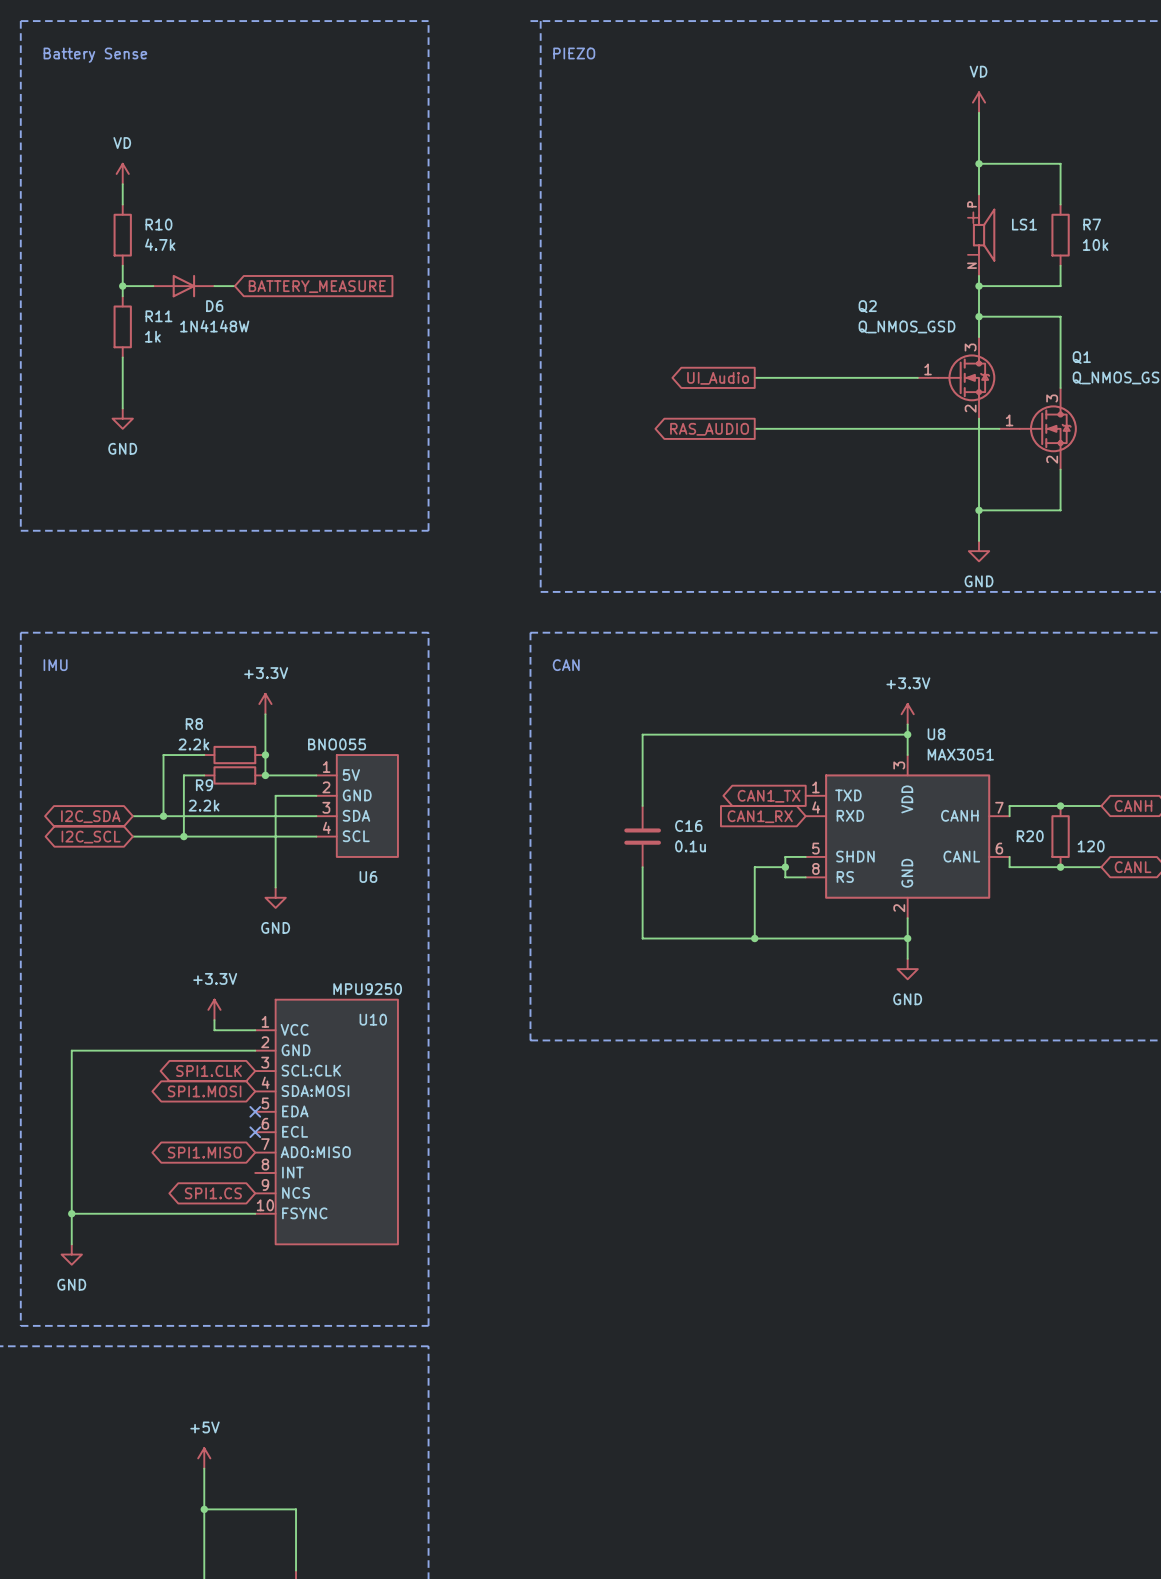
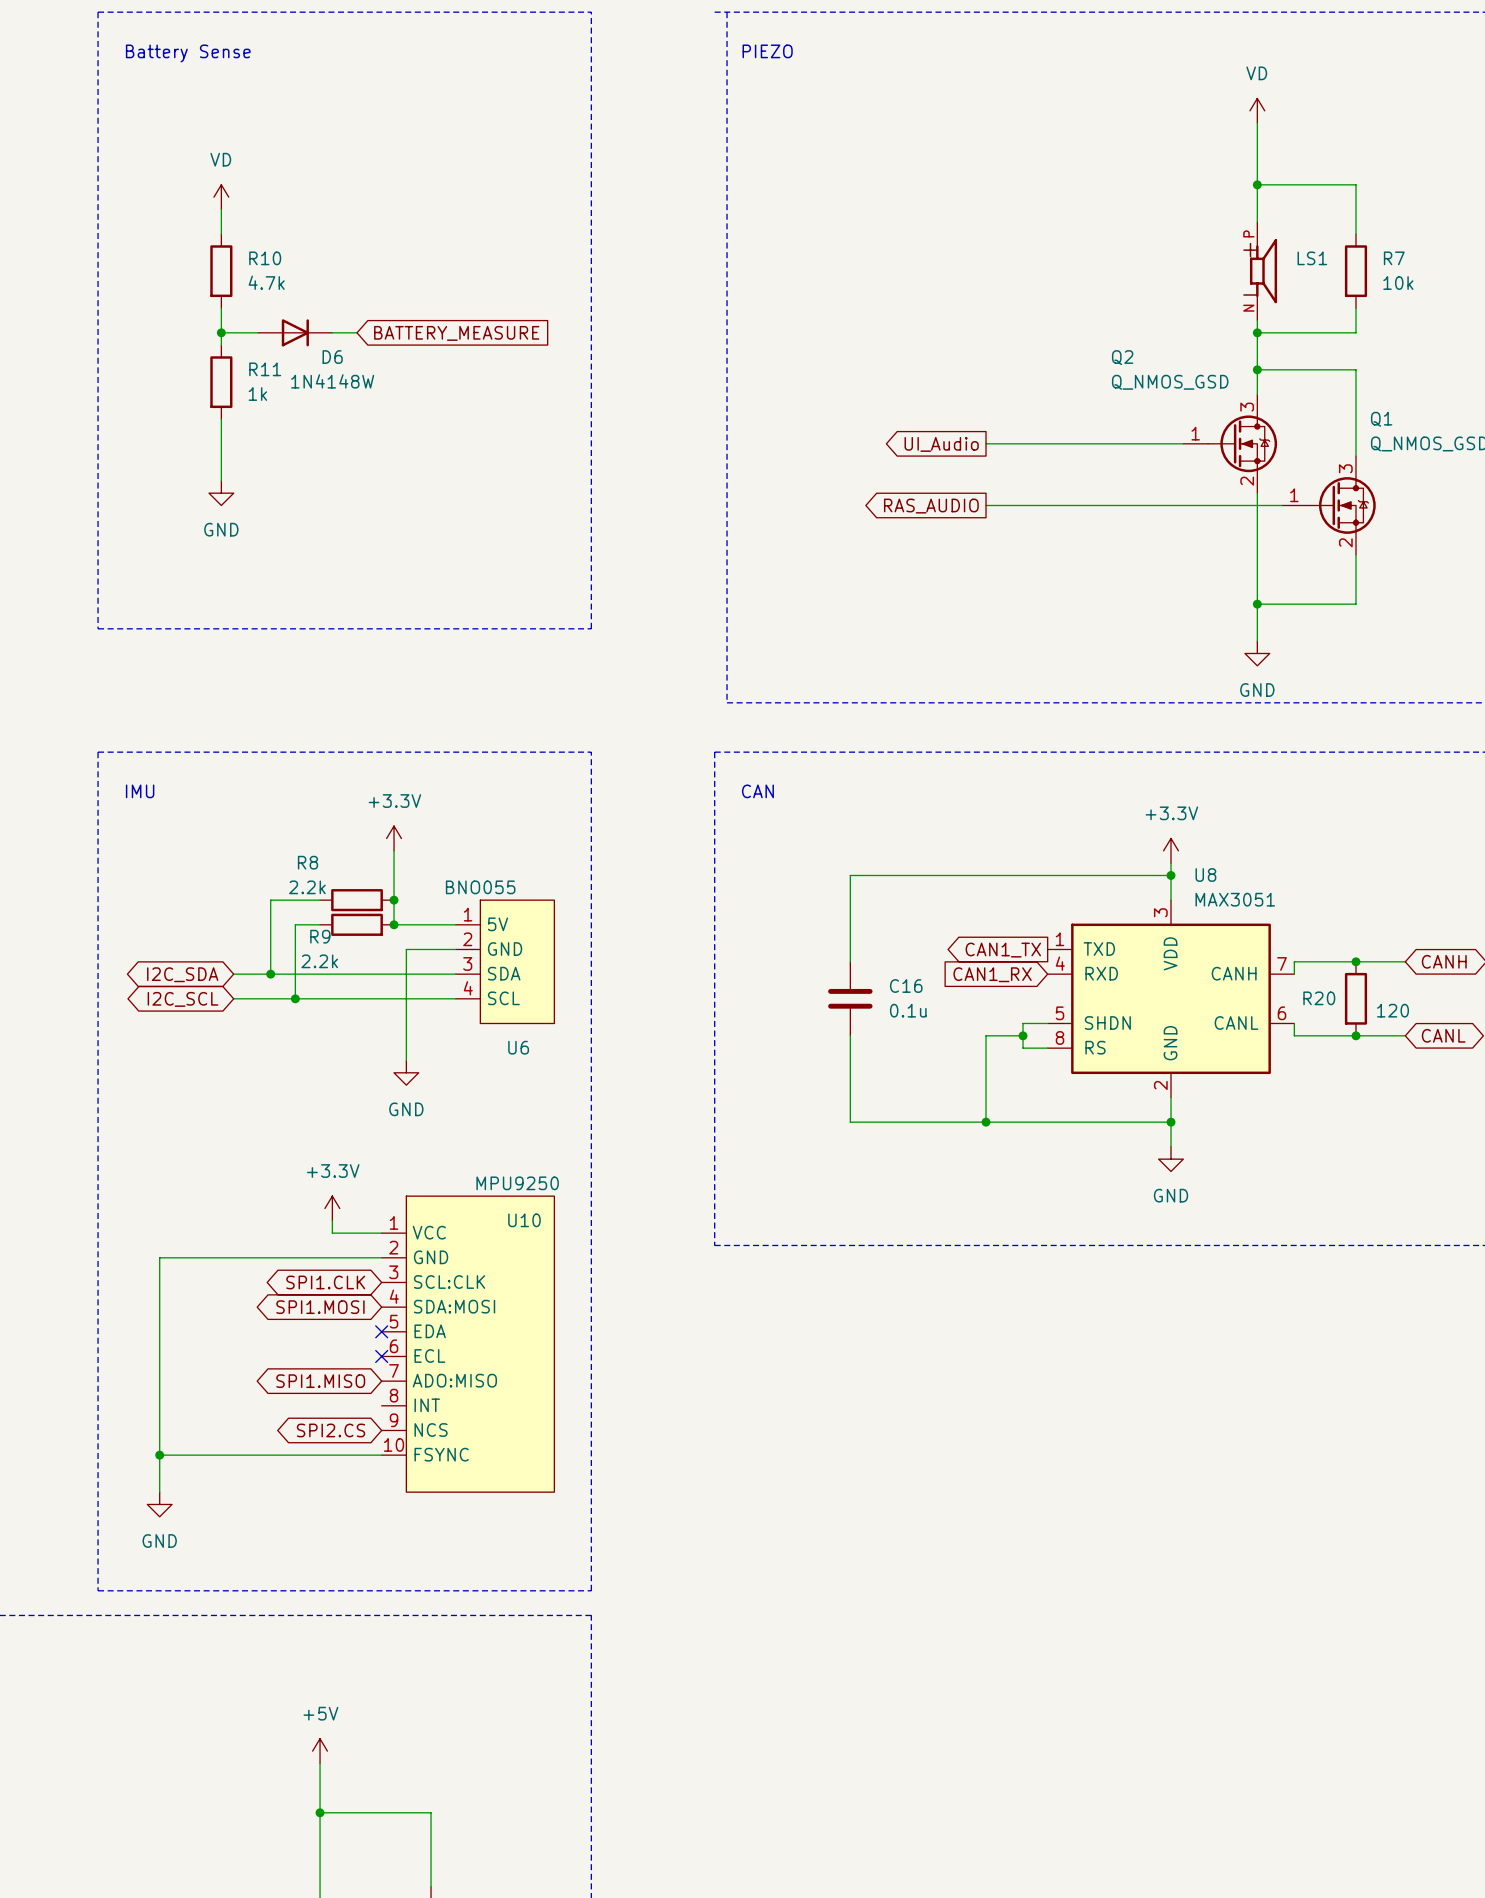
global label: SPI1.CS (213, 1193) -> SPI2.CS (331, 1430)

